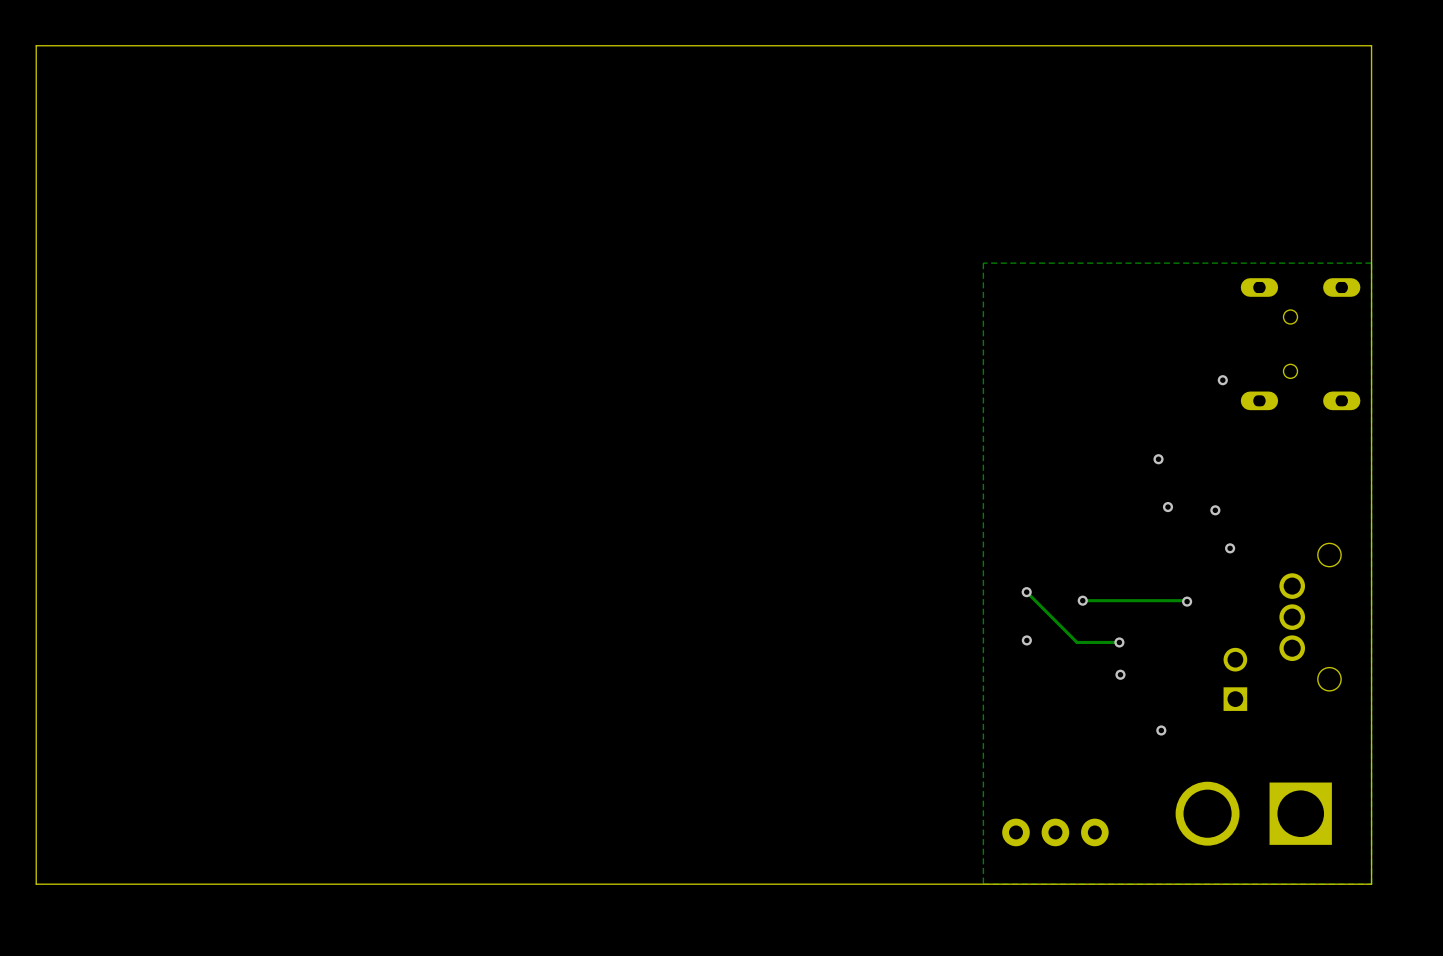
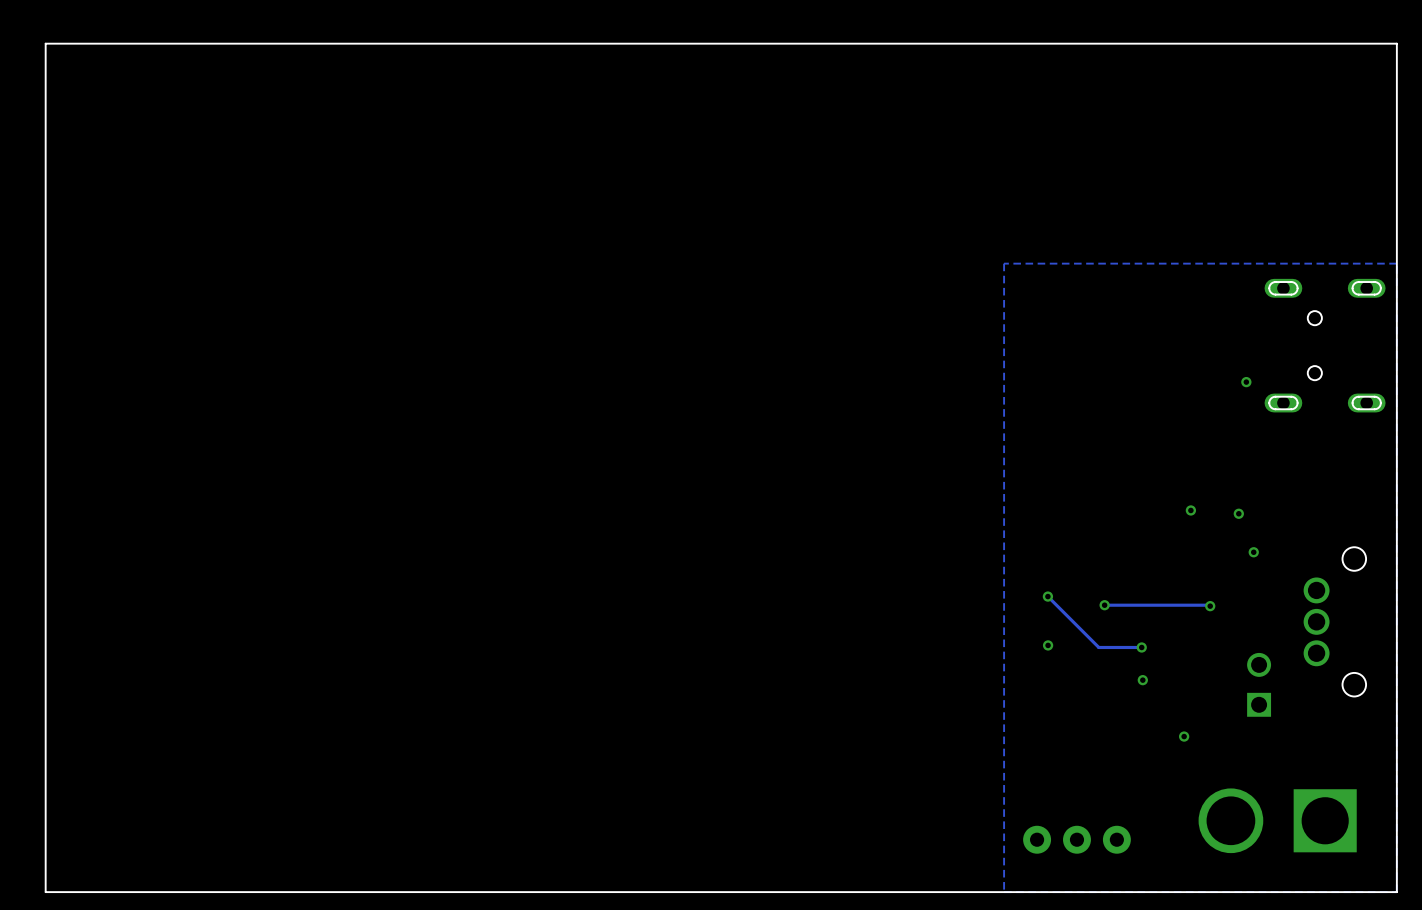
via: (1158, 459) -> none

